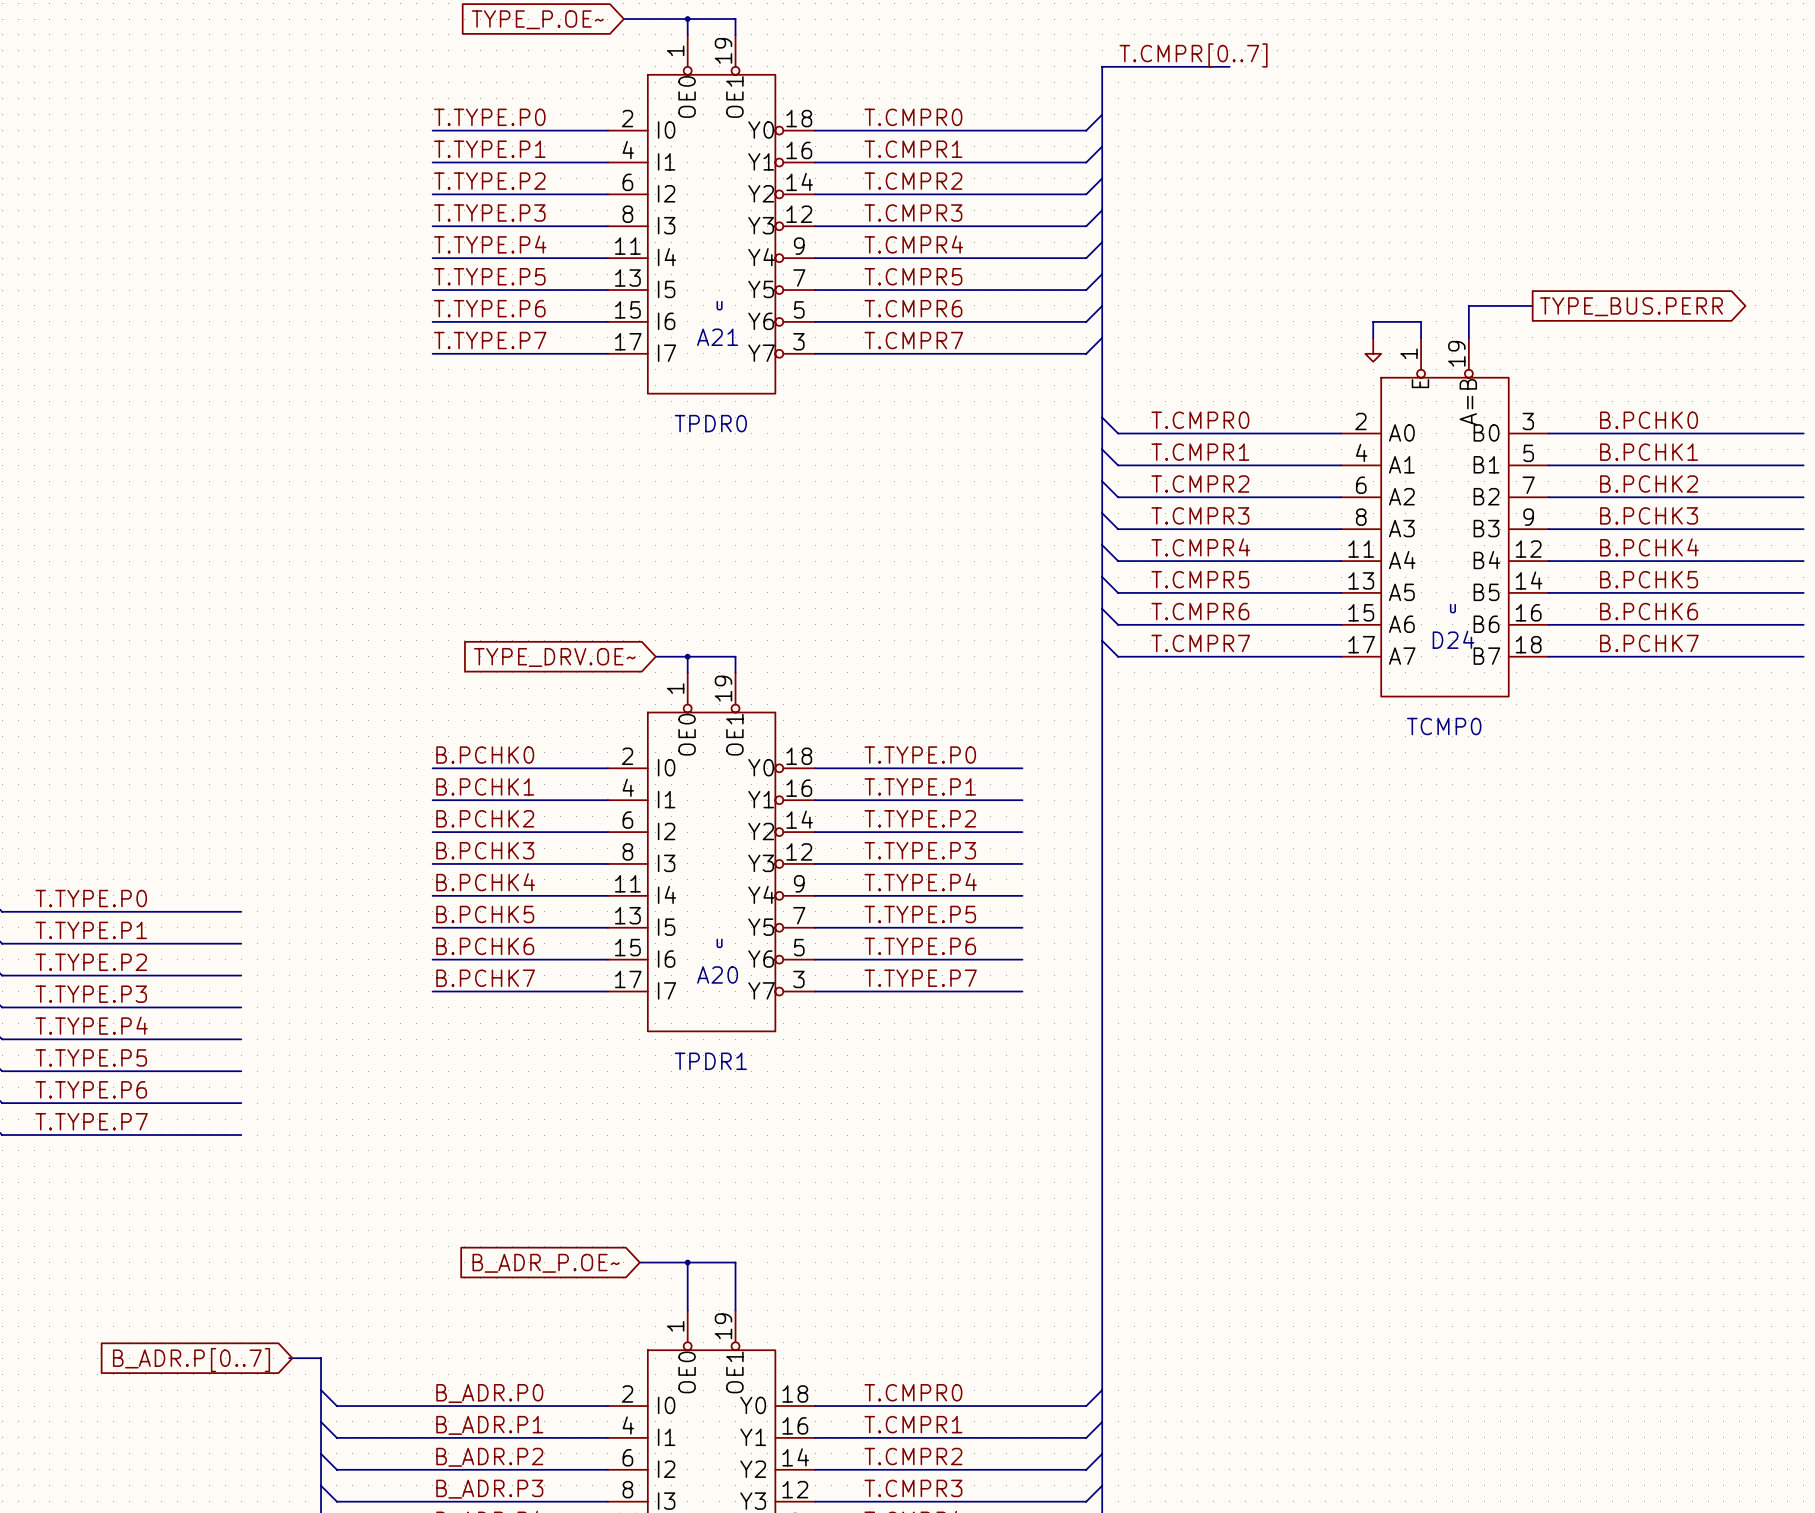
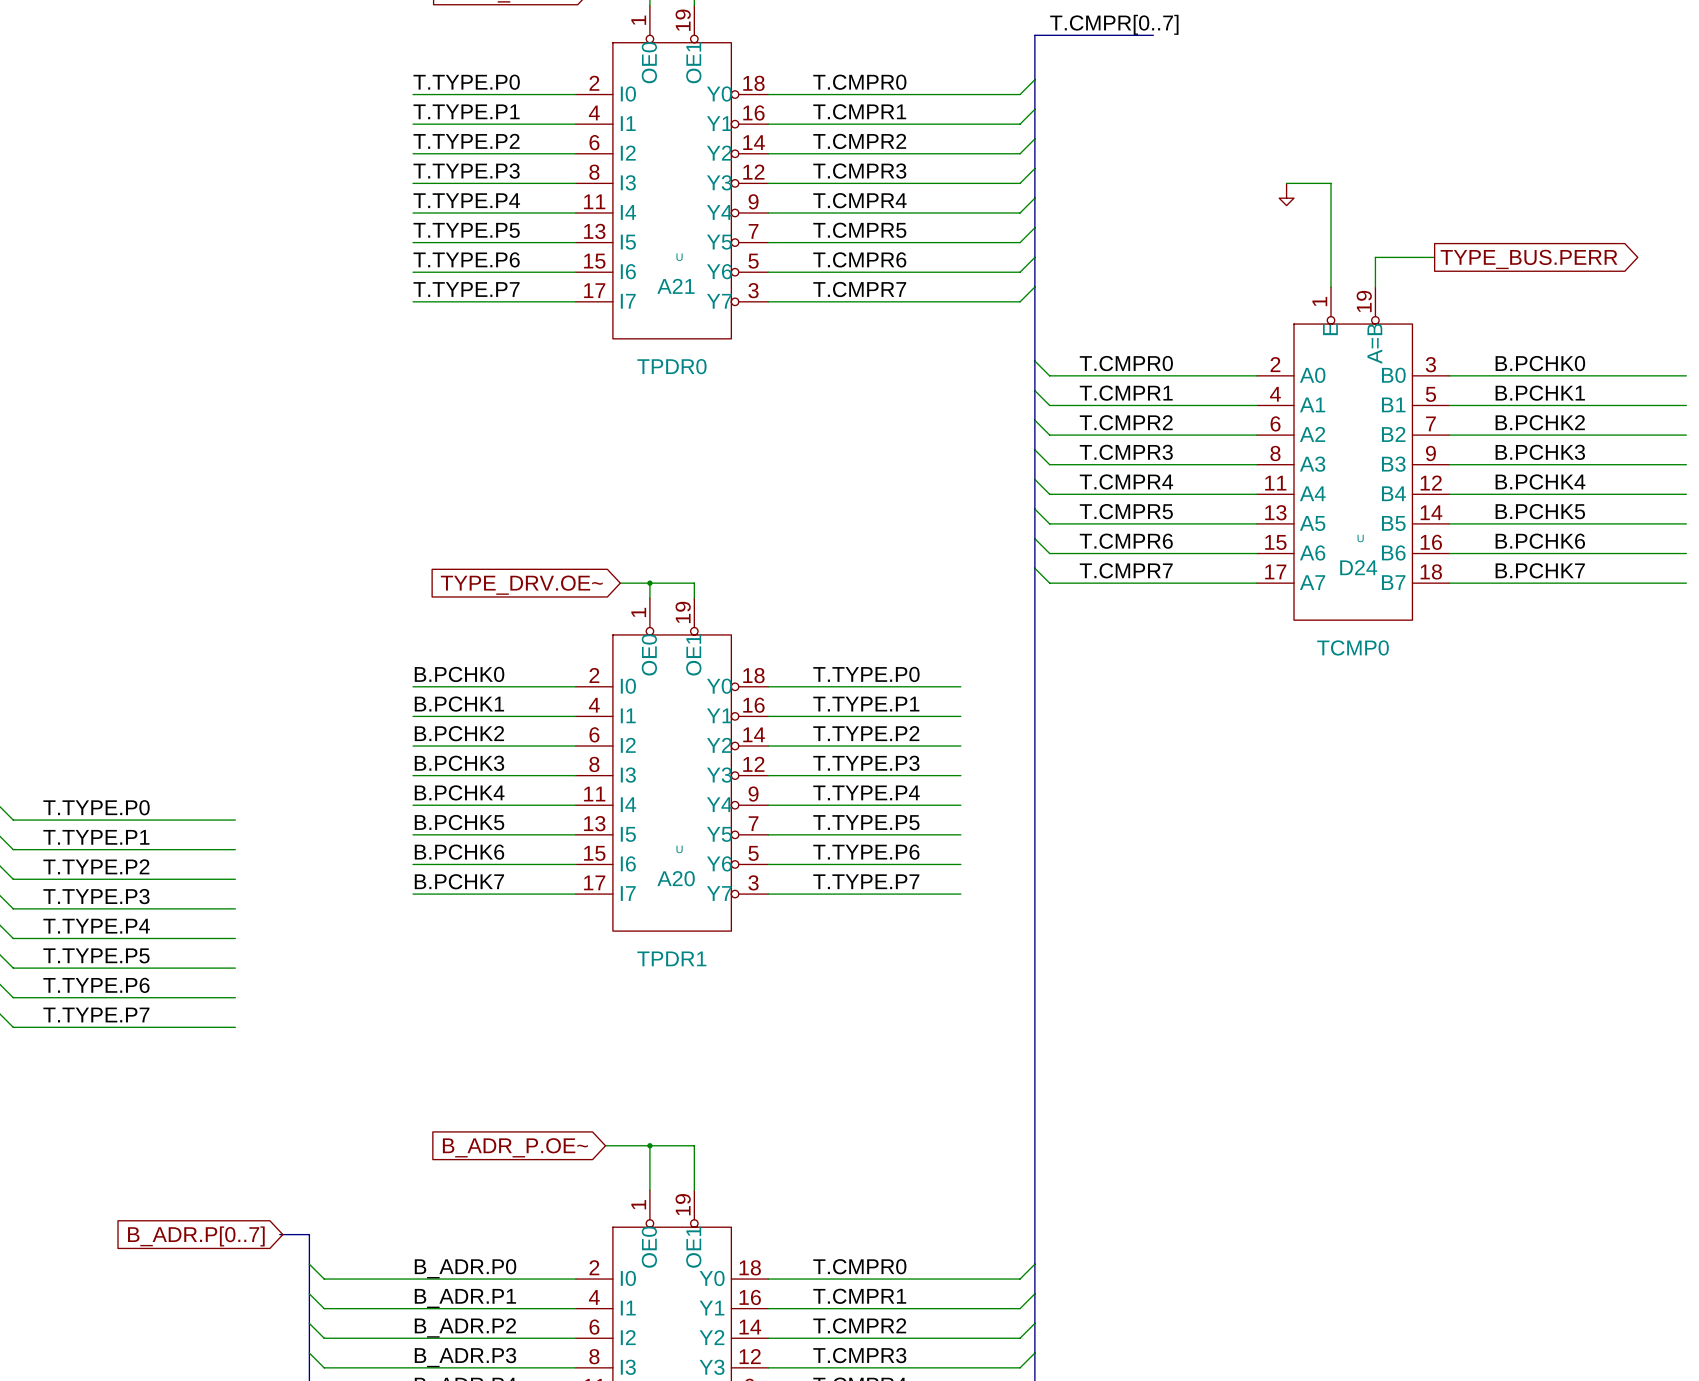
wire: (1421, 321) (1373, 321) (1373, 337) -> (1331, 272) (1331, 183) (1286, 183)
power symbol position: (1373, 350) -> (1286, 194)

